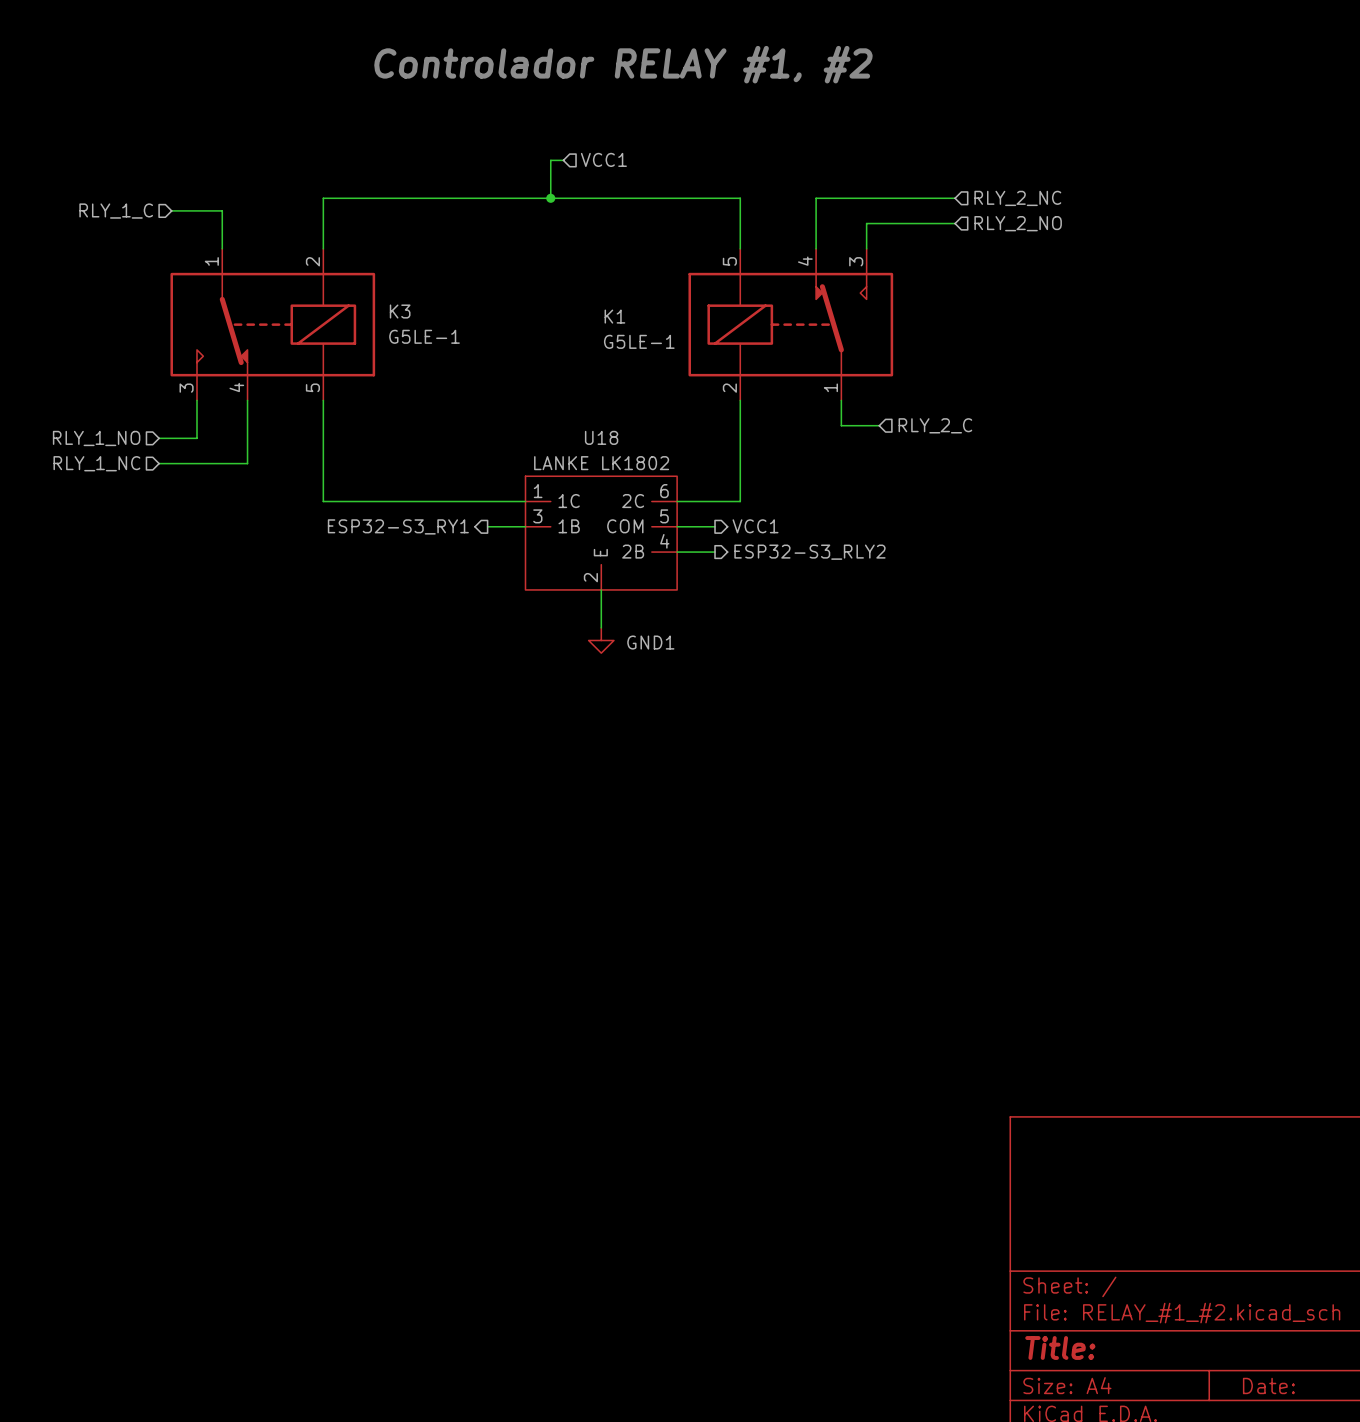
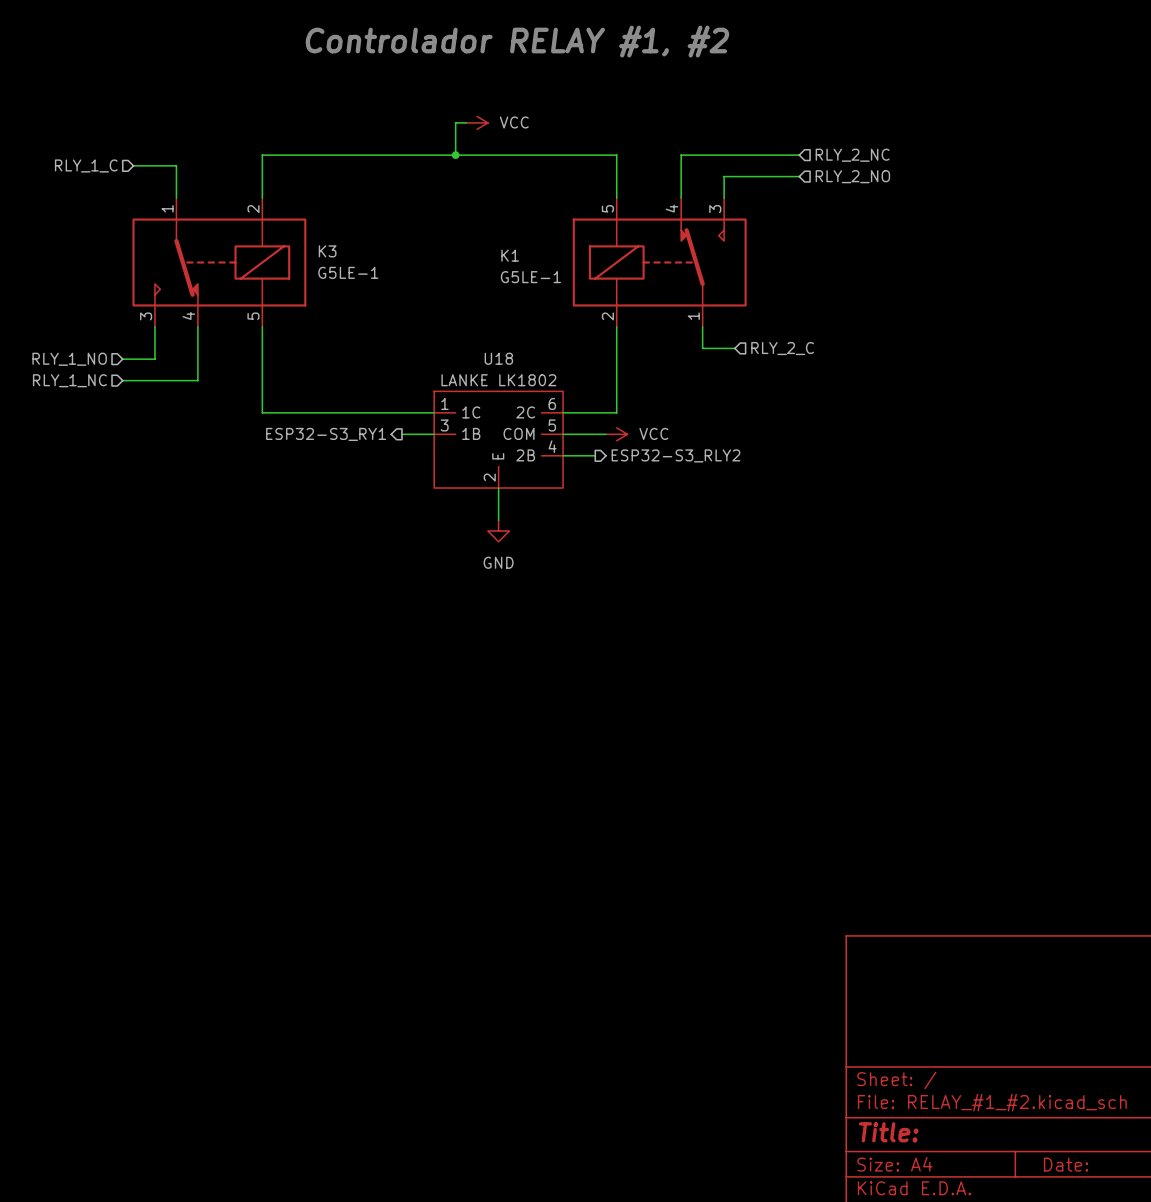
hierarchical label: VCC1 (603, 159) -> none
power symbol: none -> VCC (477, 122)
wire: none -> (595, 434) (606, 434)
power symbol: none -> VCC (616, 434)
hierarchical label: VCC1 (755, 526) -> none
power symbol: GND1 (601, 640) -> GND (498, 530)

